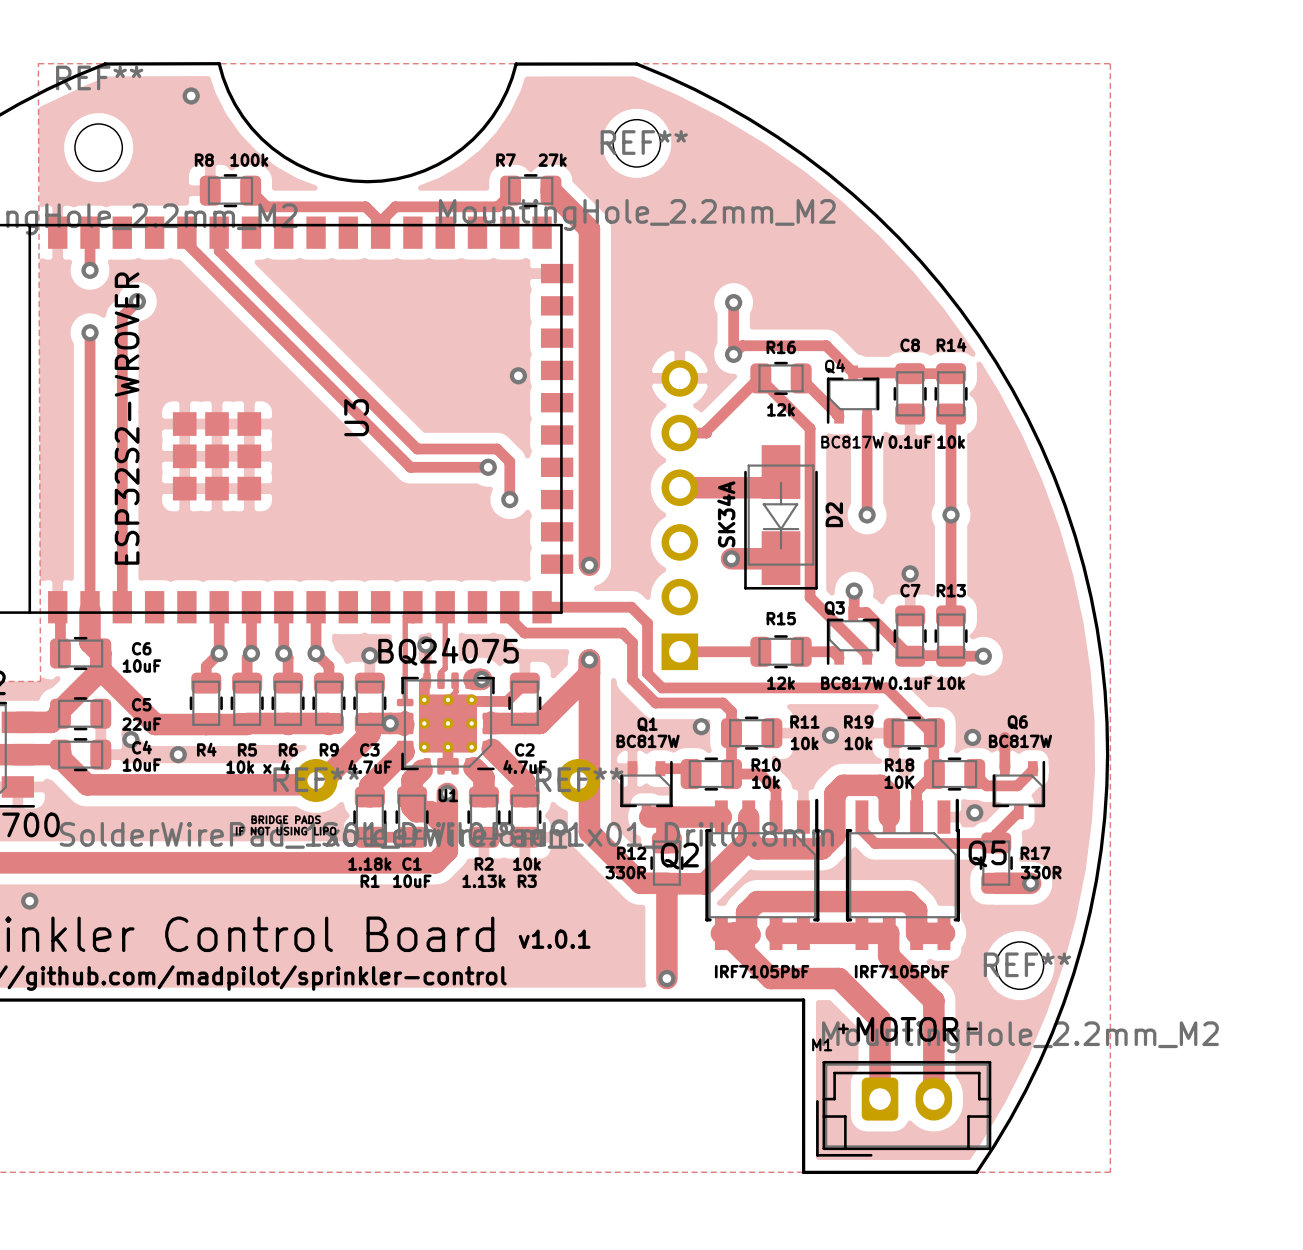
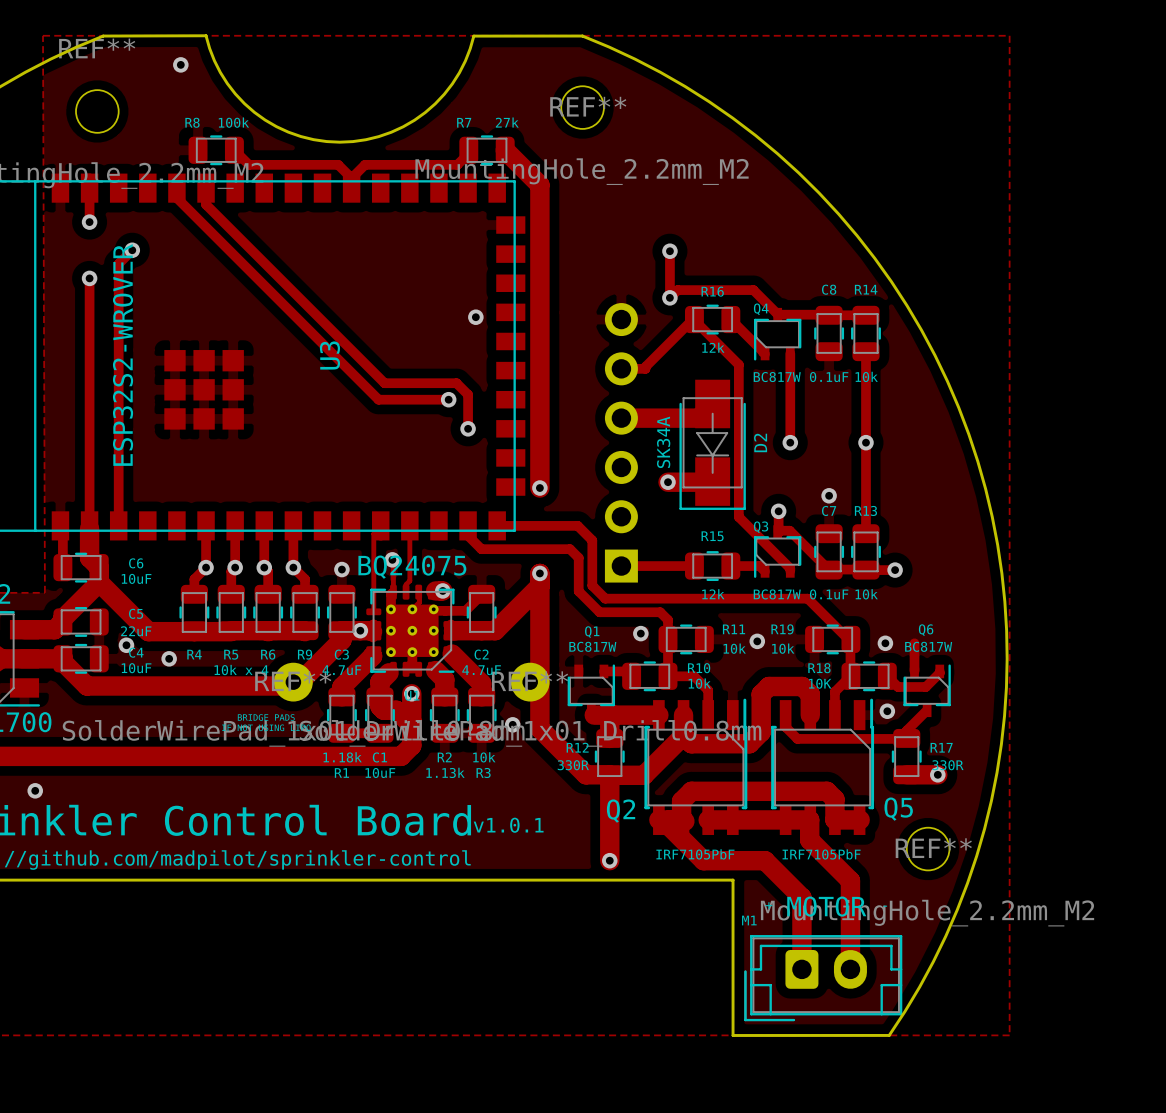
Q5 name position: Q5 (987, 853) -> Q5 (898, 809)
Q2 name position: Q2 (679, 856) -> Q2 (621, 811)

